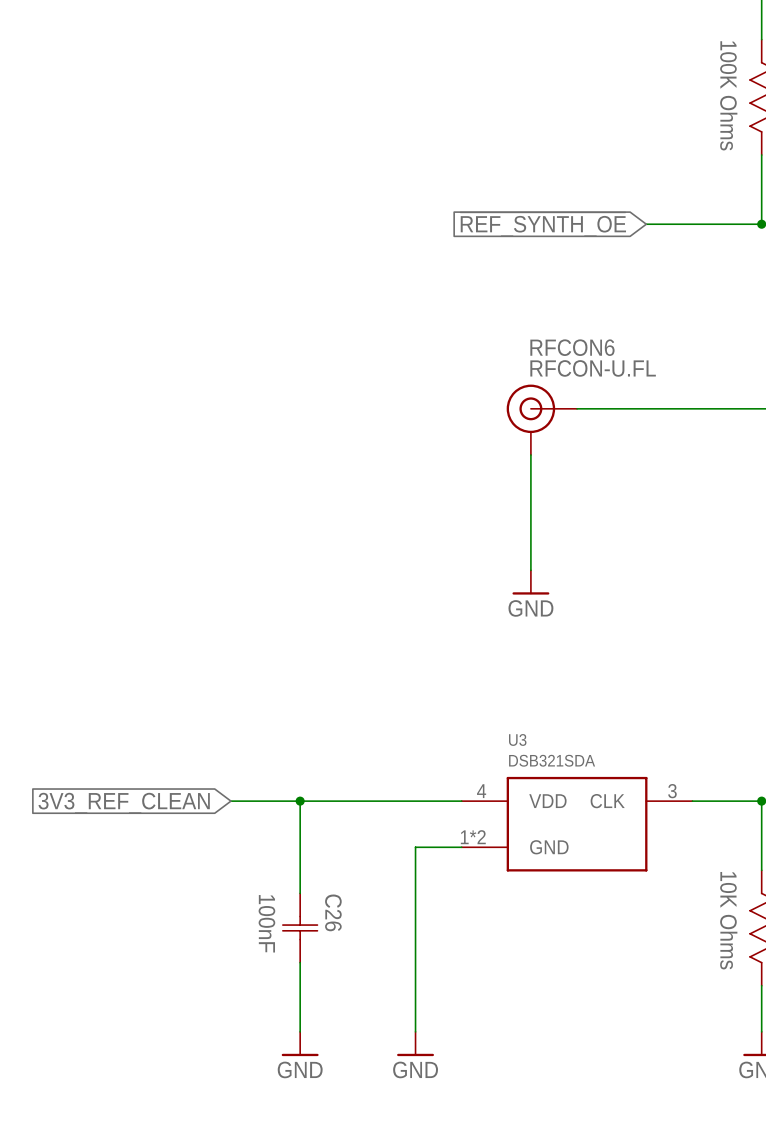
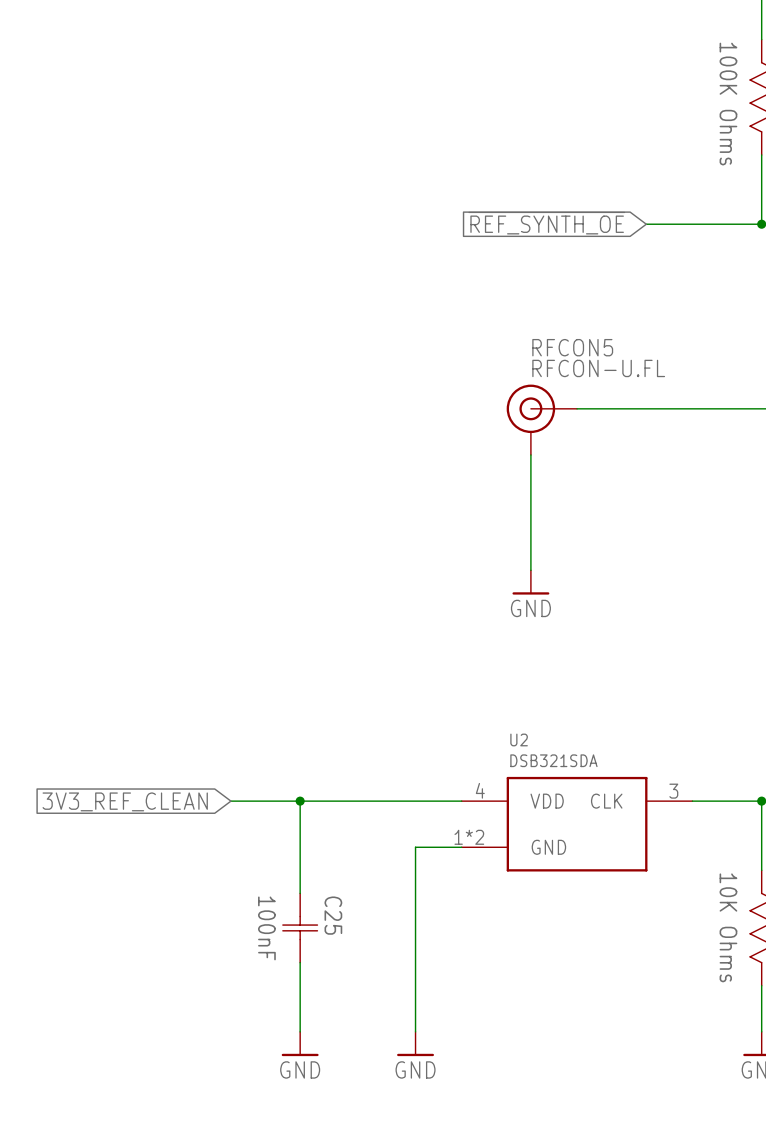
RFCON6 name: RFCON6 (572, 347) -> RFCON5 (572, 347)
U3 name: U3 (517, 739) -> U2 (519, 739)
C26 name: C26 (333, 912) -> C25 (333, 915)

